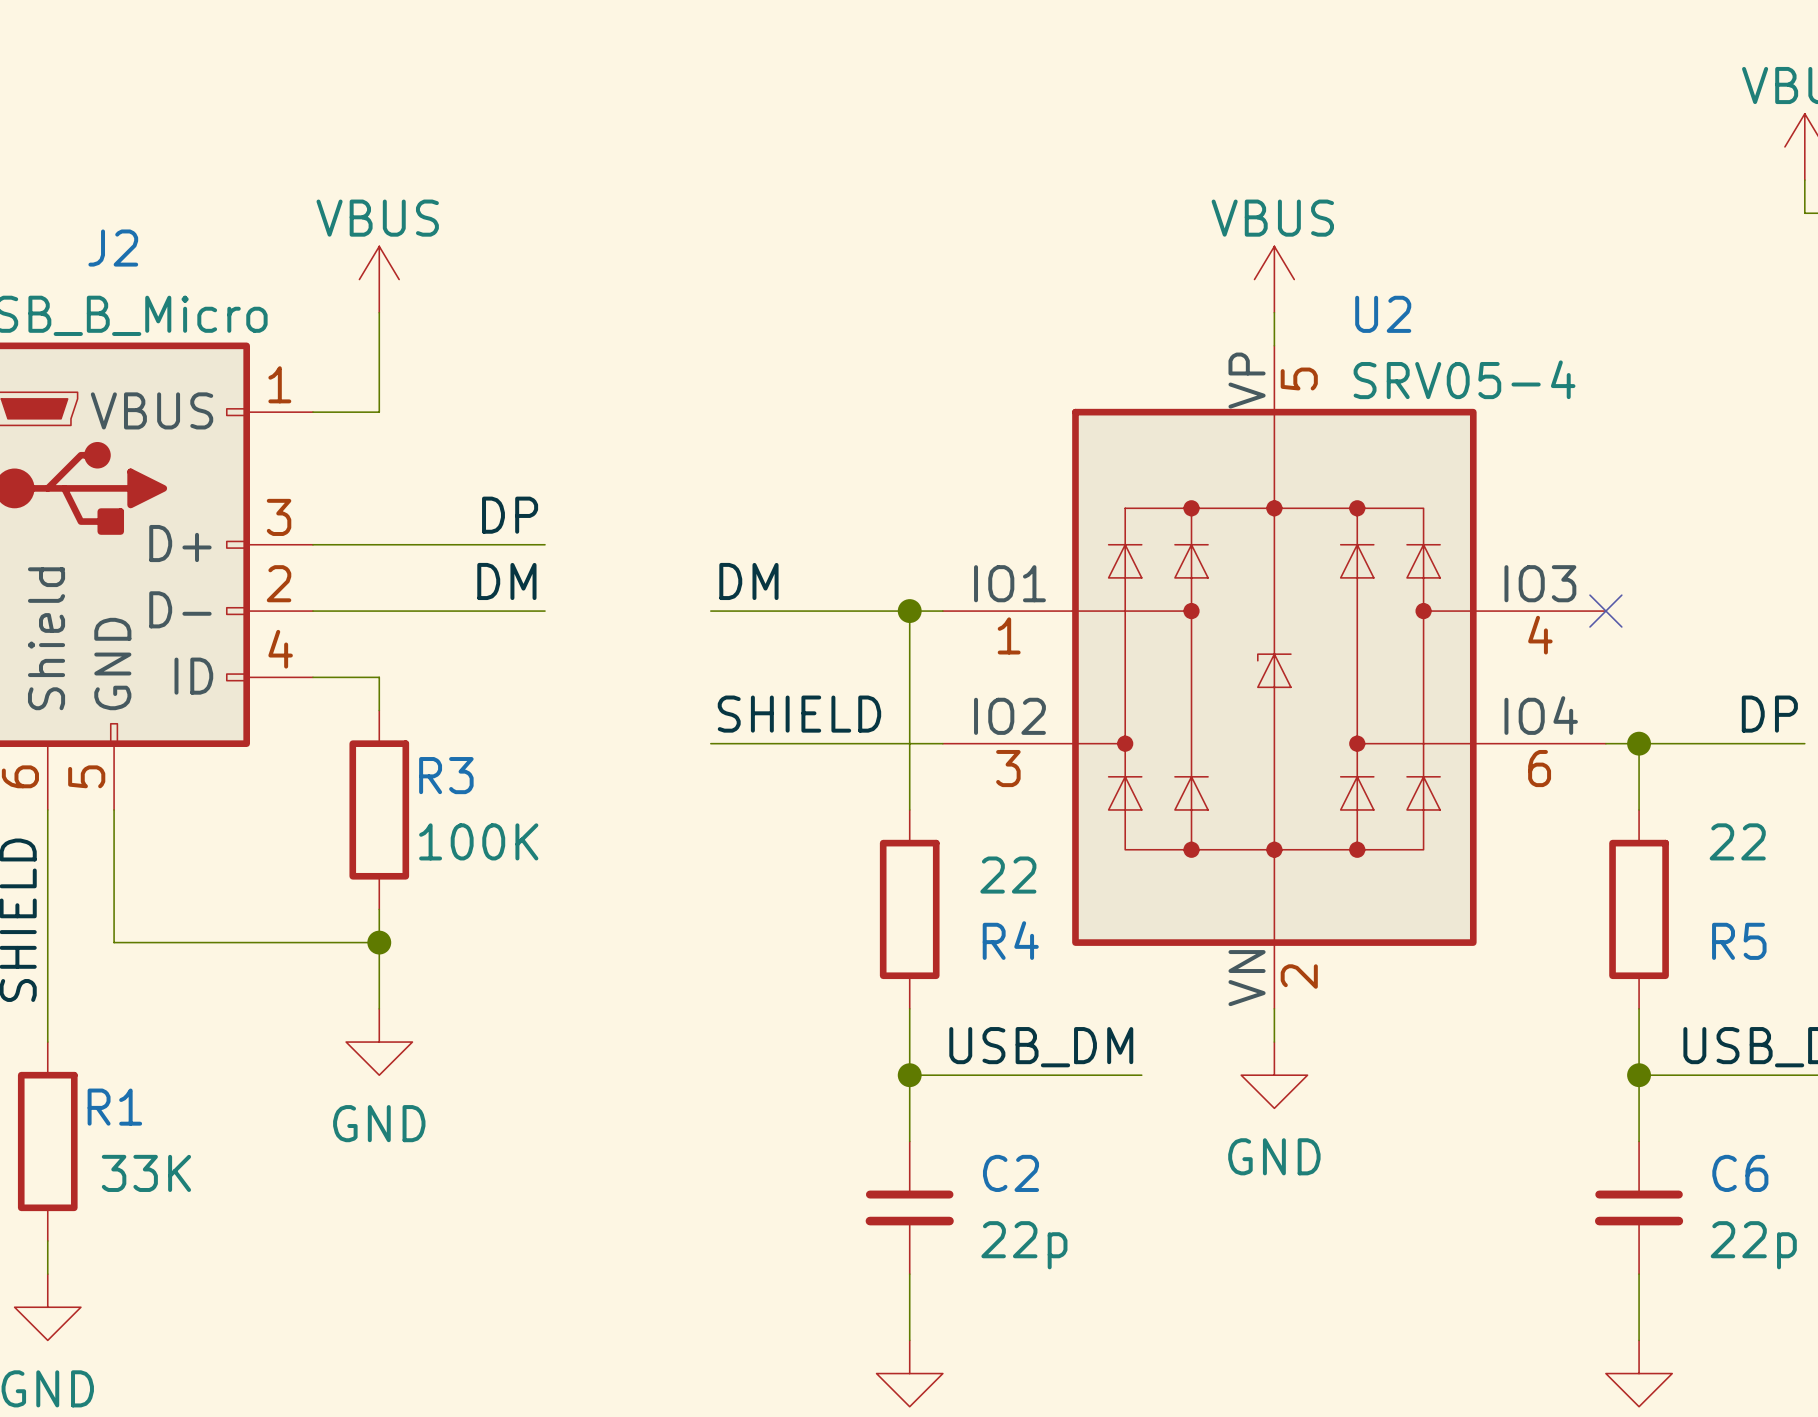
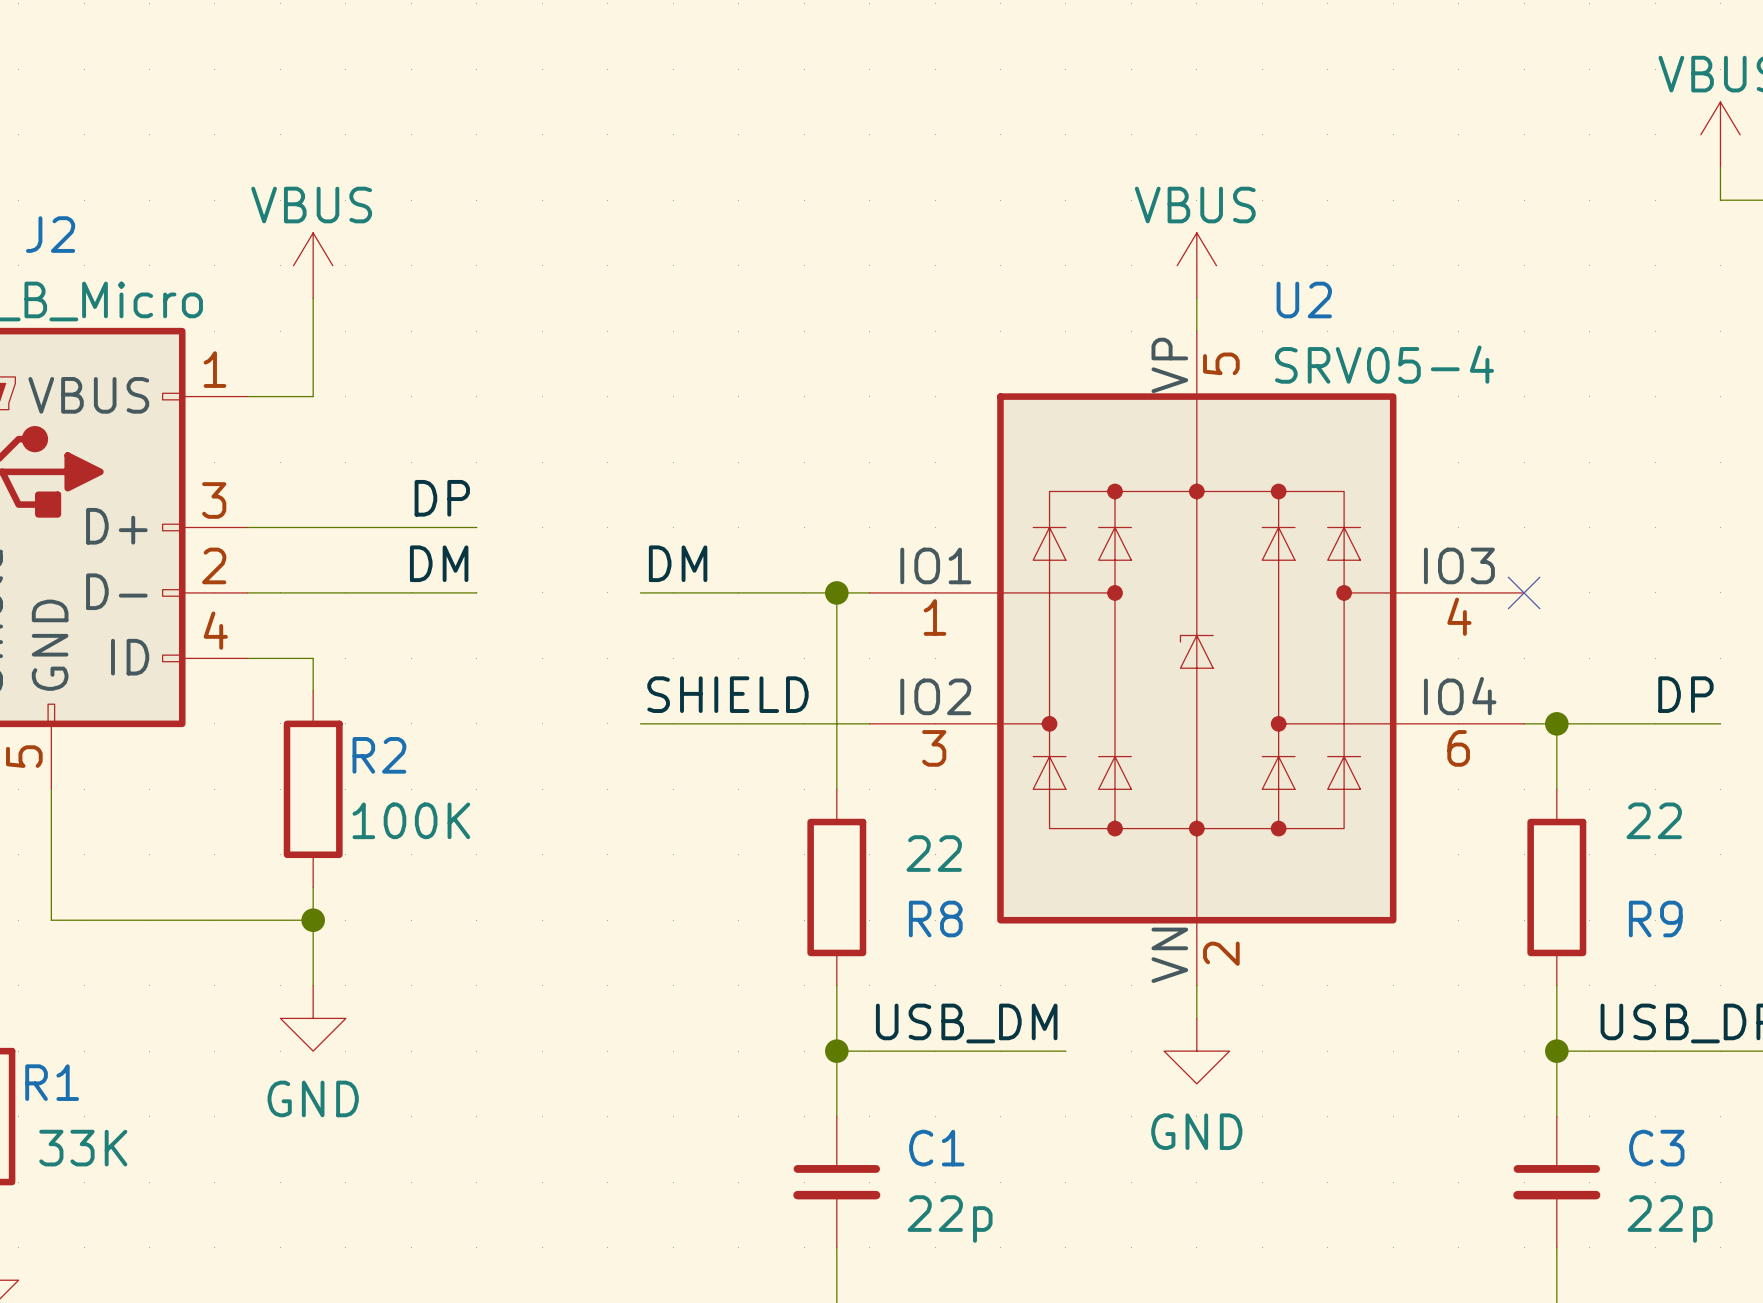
R3 name: R3 (446, 775) -> R2 (379, 755)
R4 name: R4 (1010, 940) -> R8 (935, 919)
R5 name: R5 (1739, 941) -> R9 (1655, 919)
C2 name: C2 (1011, 1173) -> C1 (936, 1148)
C6 name: C6 (1740, 1173) -> C3 (1656, 1148)

